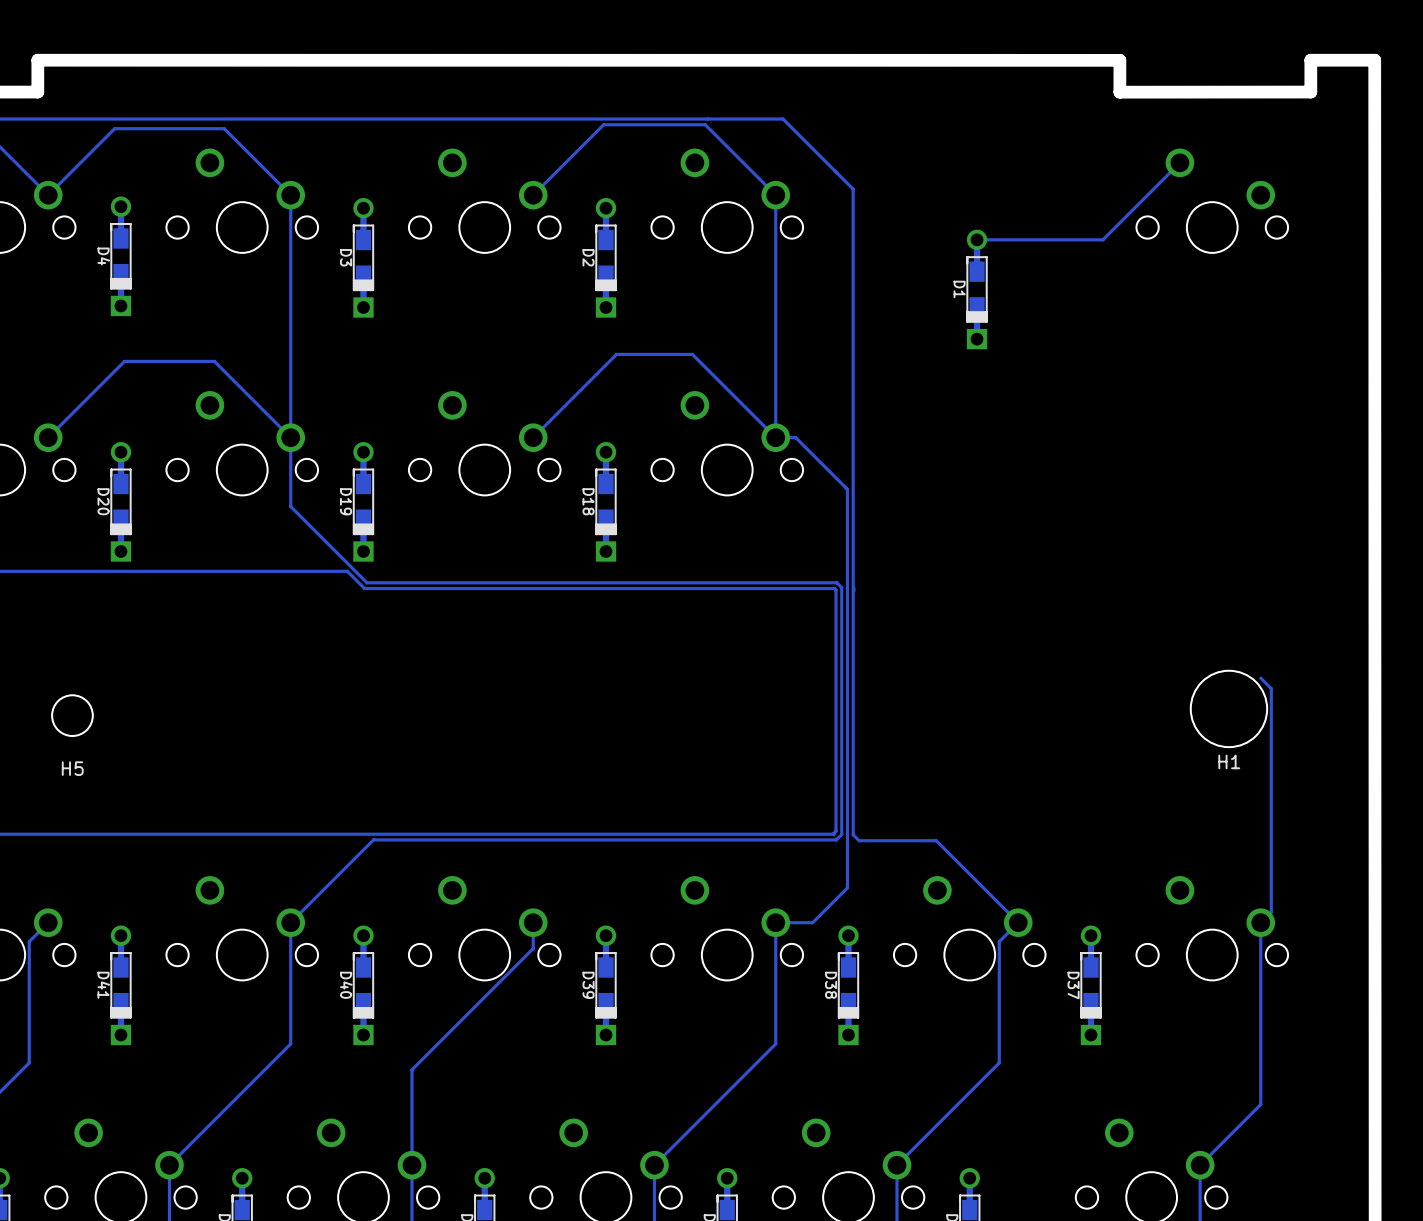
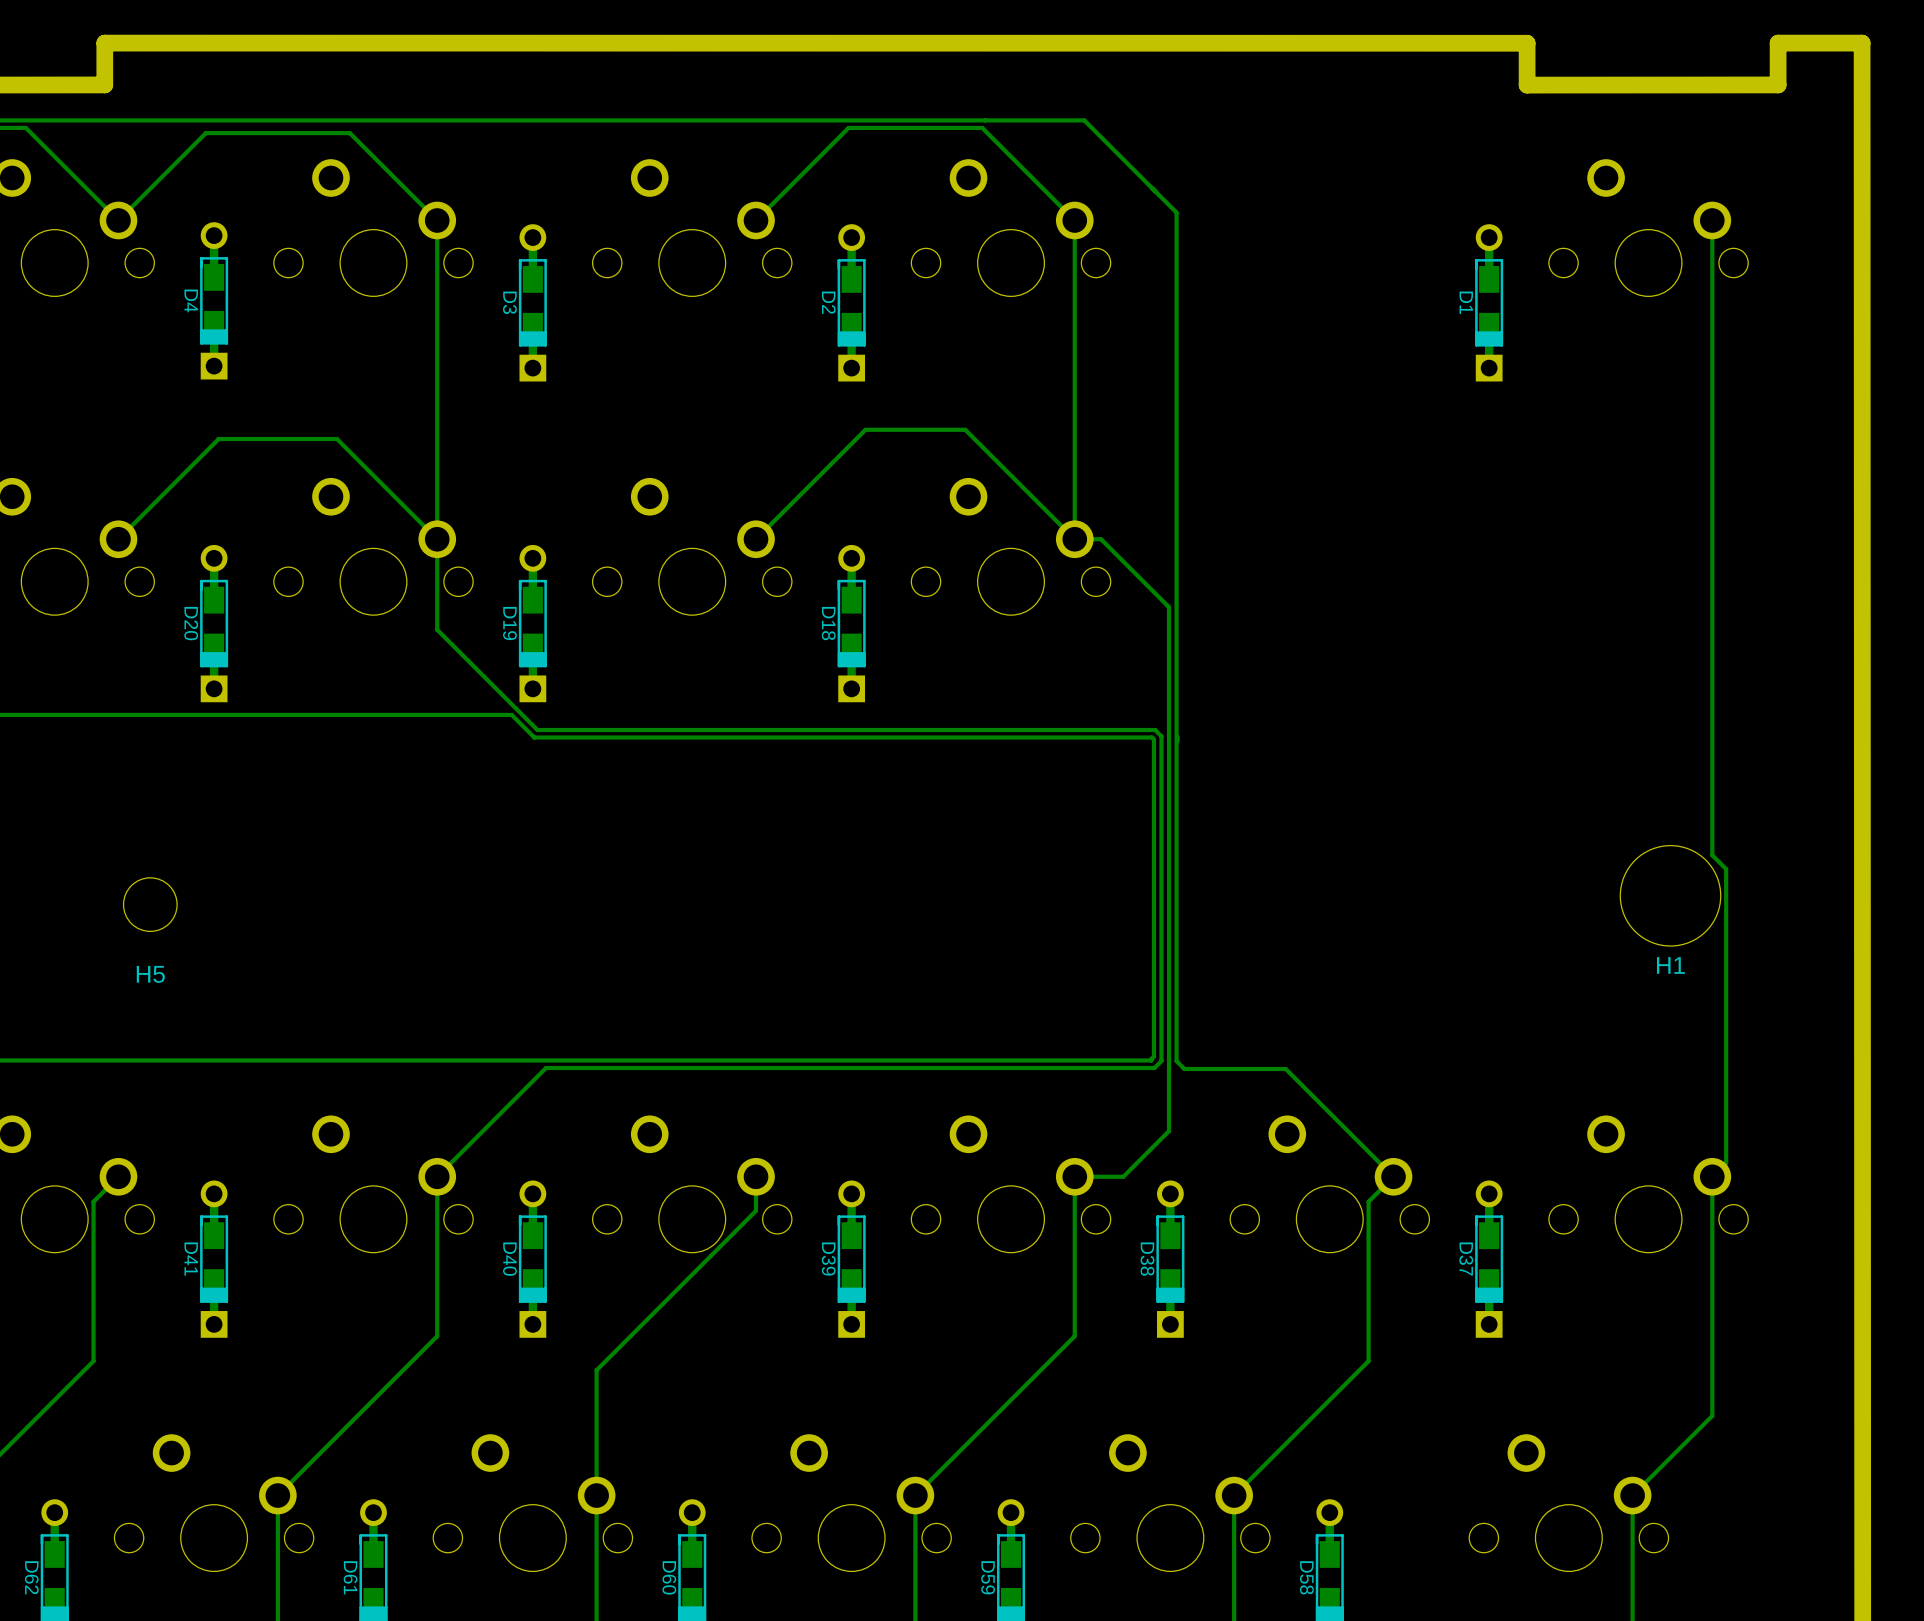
track: (1179, 162) (1102, 239) (977, 239) -> none
track: none -> (1712, 220) (1712, 855)
D1 position: (977, 289) -> (1489, 302)

